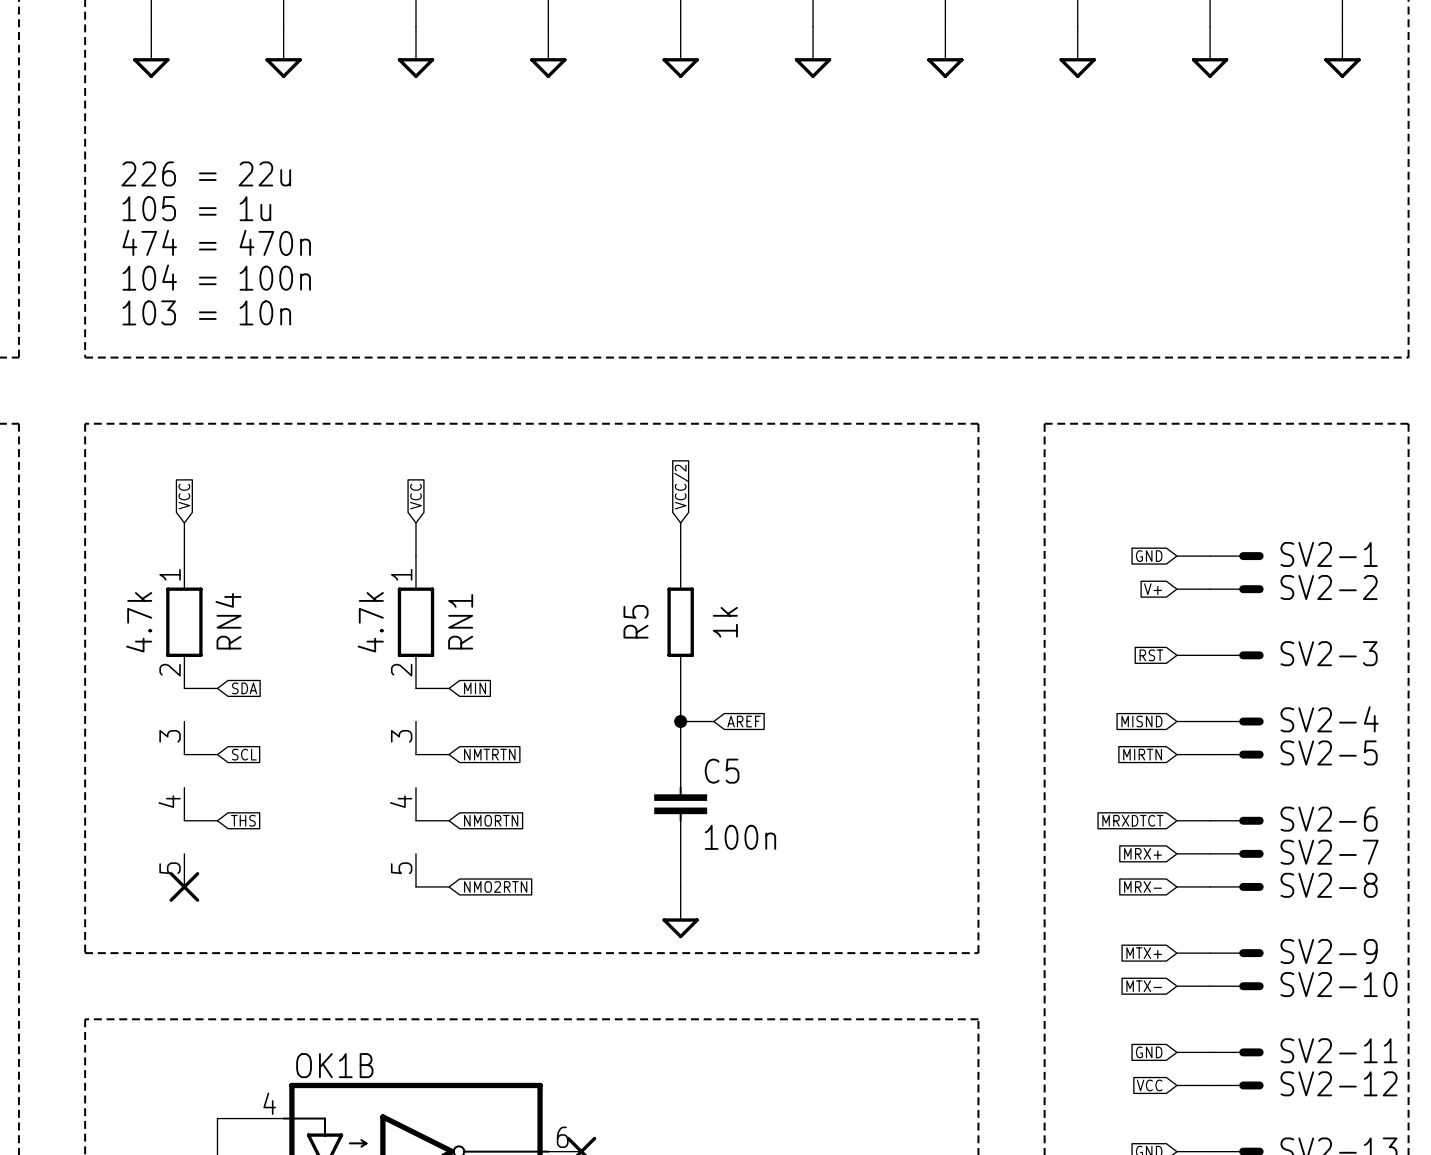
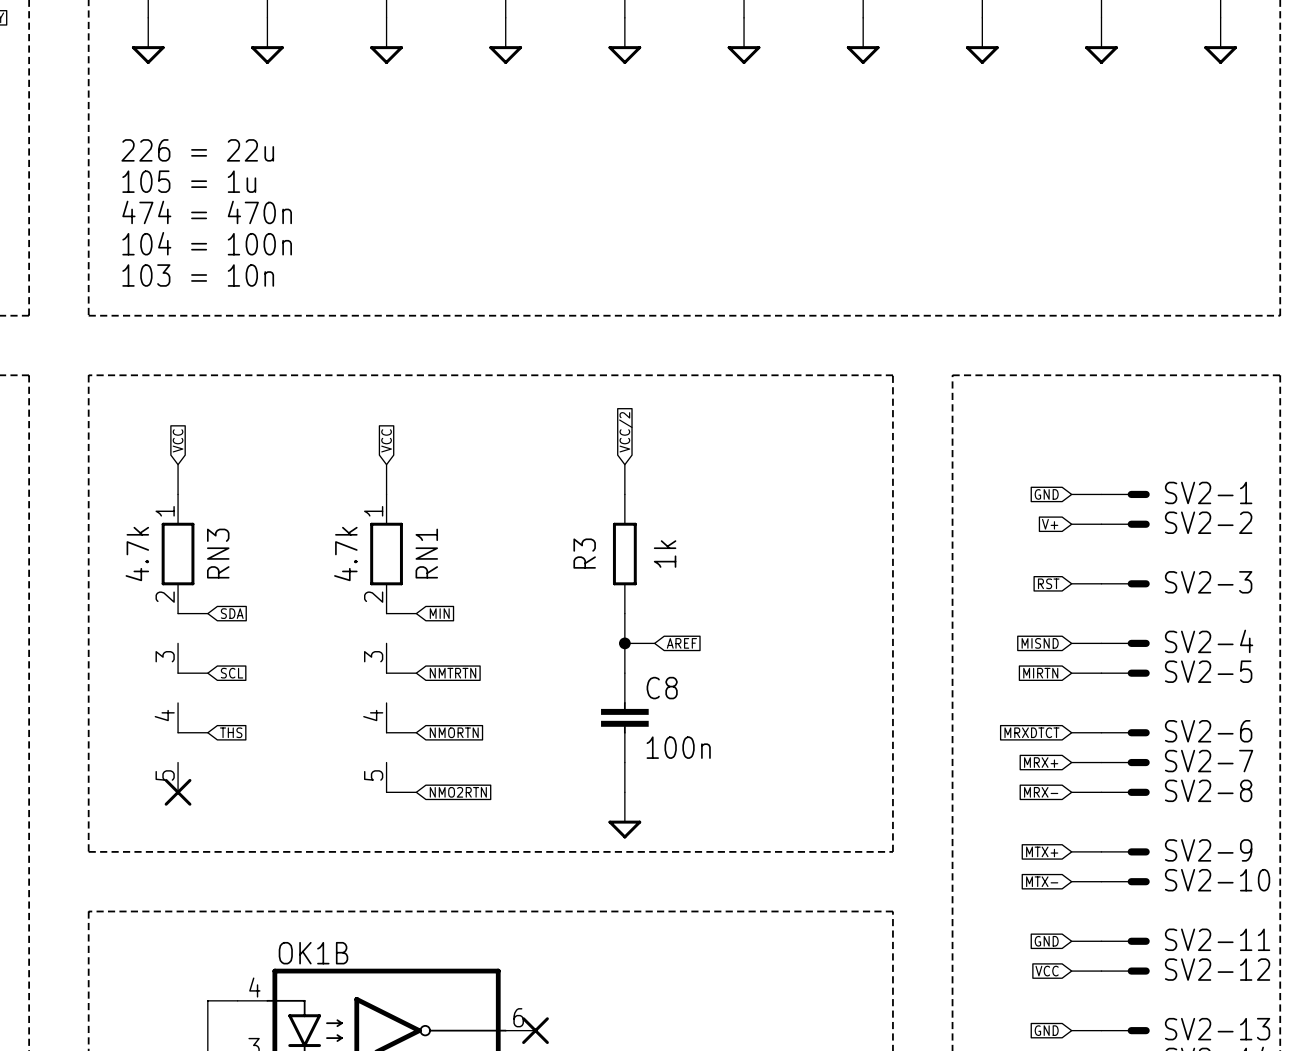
RN4 name: RN4 (228, 621) -> RN3 (218, 553)
R5 name: R5 (636, 621) -> R3 (584, 553)
C5 name: C5 (722, 771) -> C8 (662, 688)

